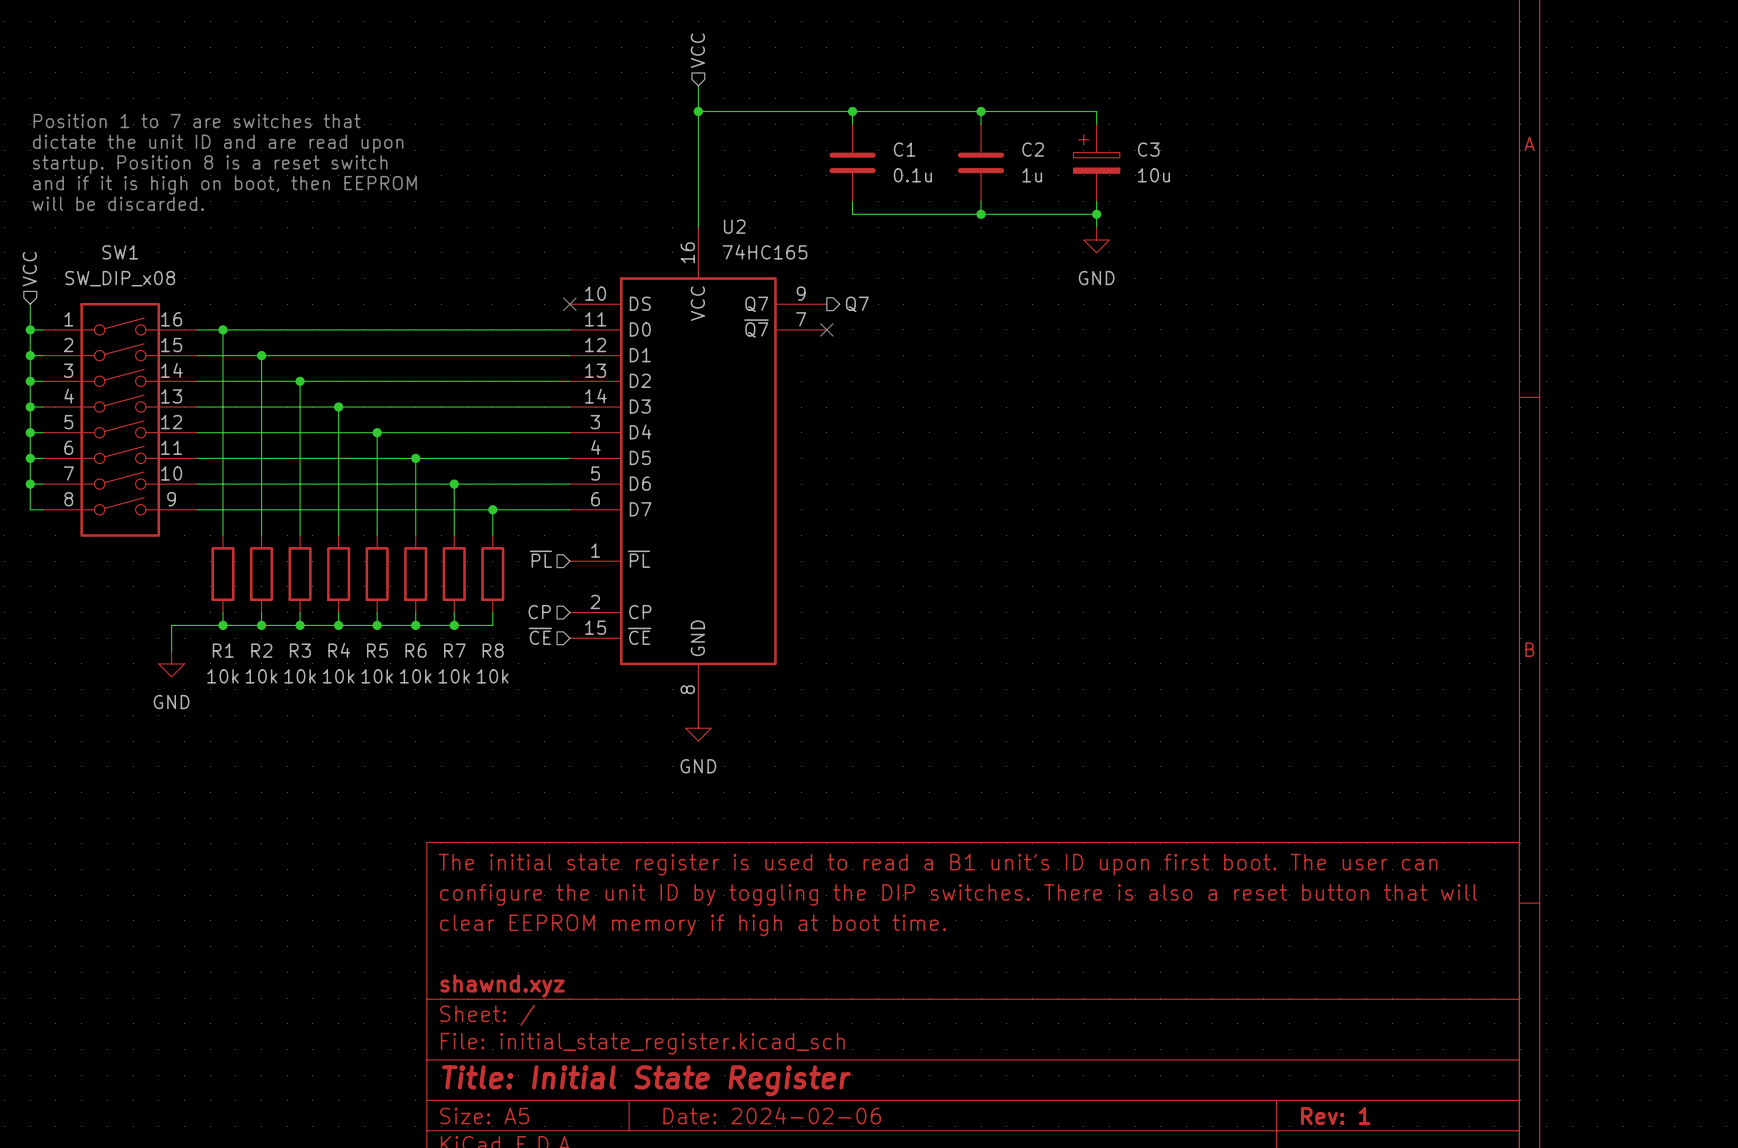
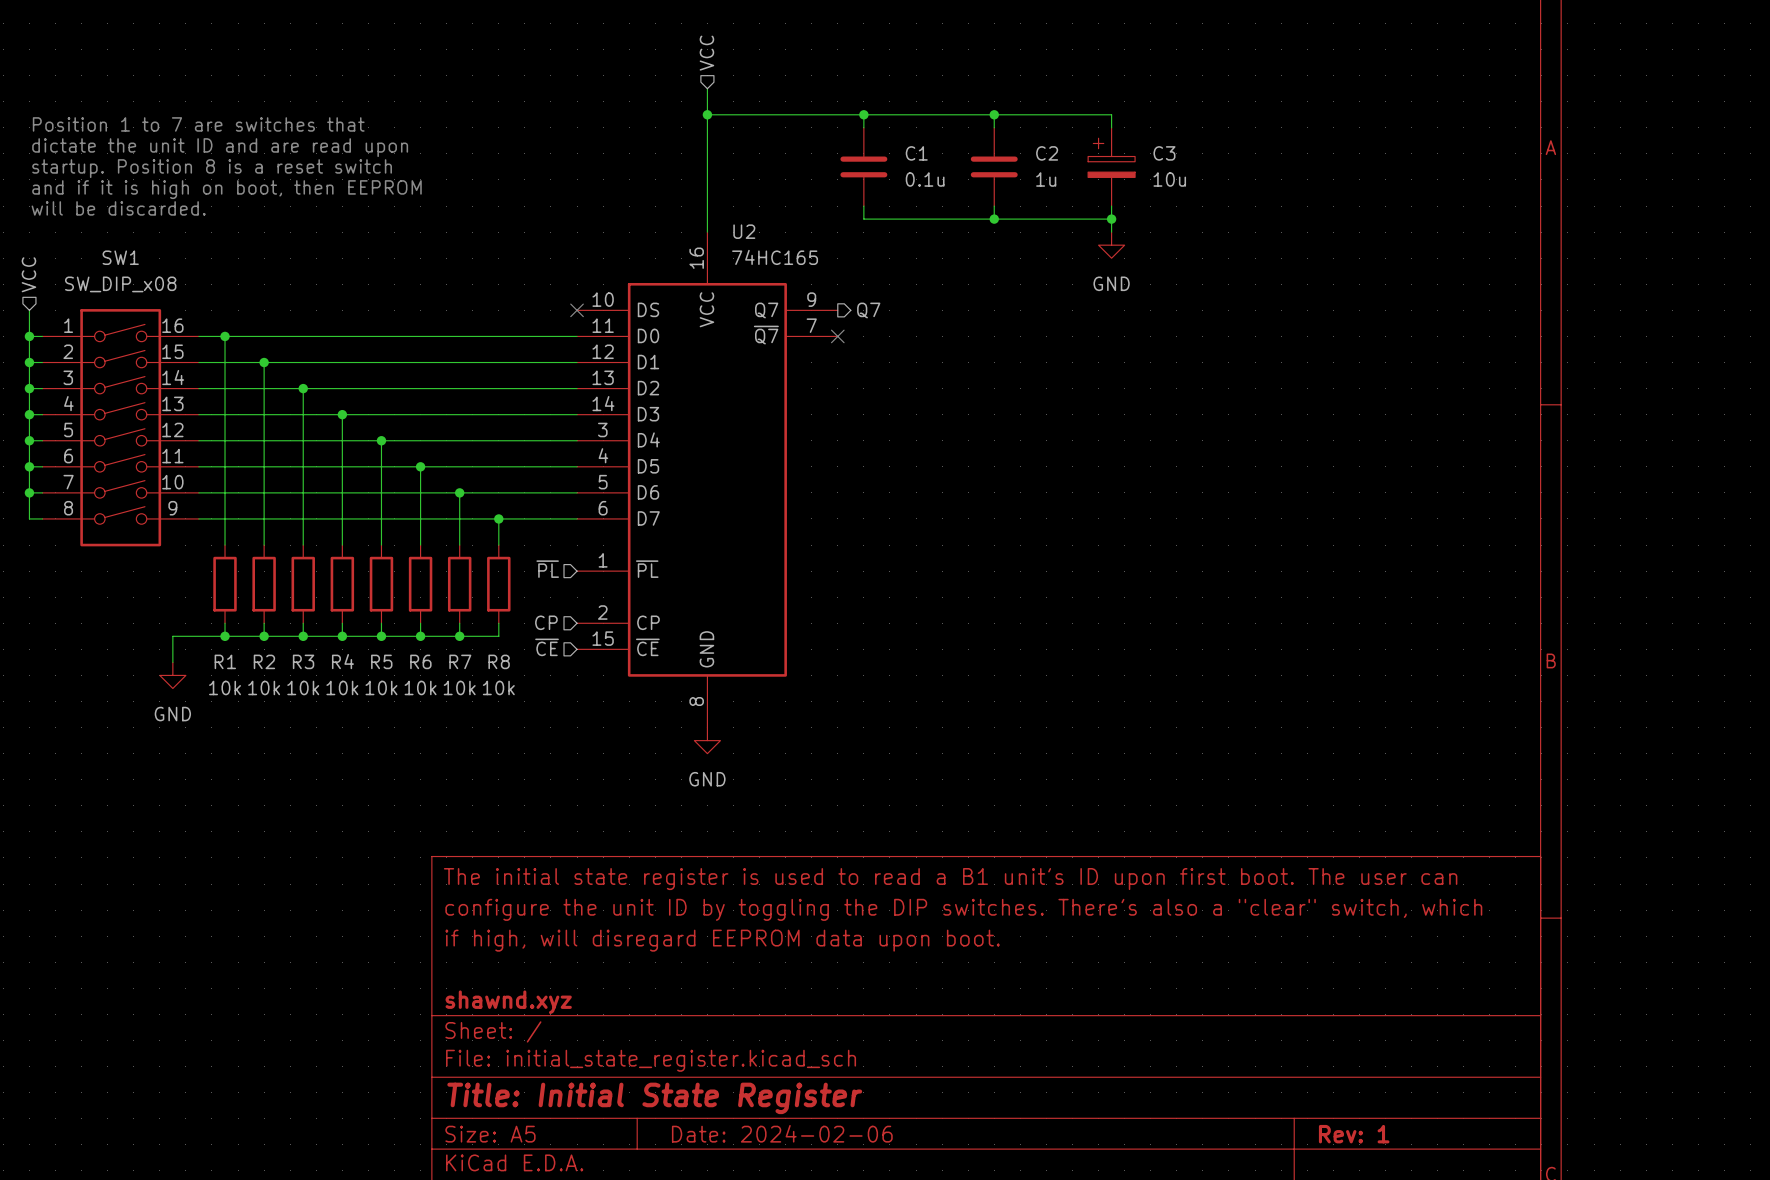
title block: configure the unit ID by toggling the DIP switches. There is also a reset button that will (958, 894) -> configure the unit ID by toggling the DIP switches. There's also a "clear" switch, which (963, 909)
title block: clear EEPROM memory if high at boot time. (693, 925) -> if high, will disregard EEPROM data upon boot. (722, 940)

